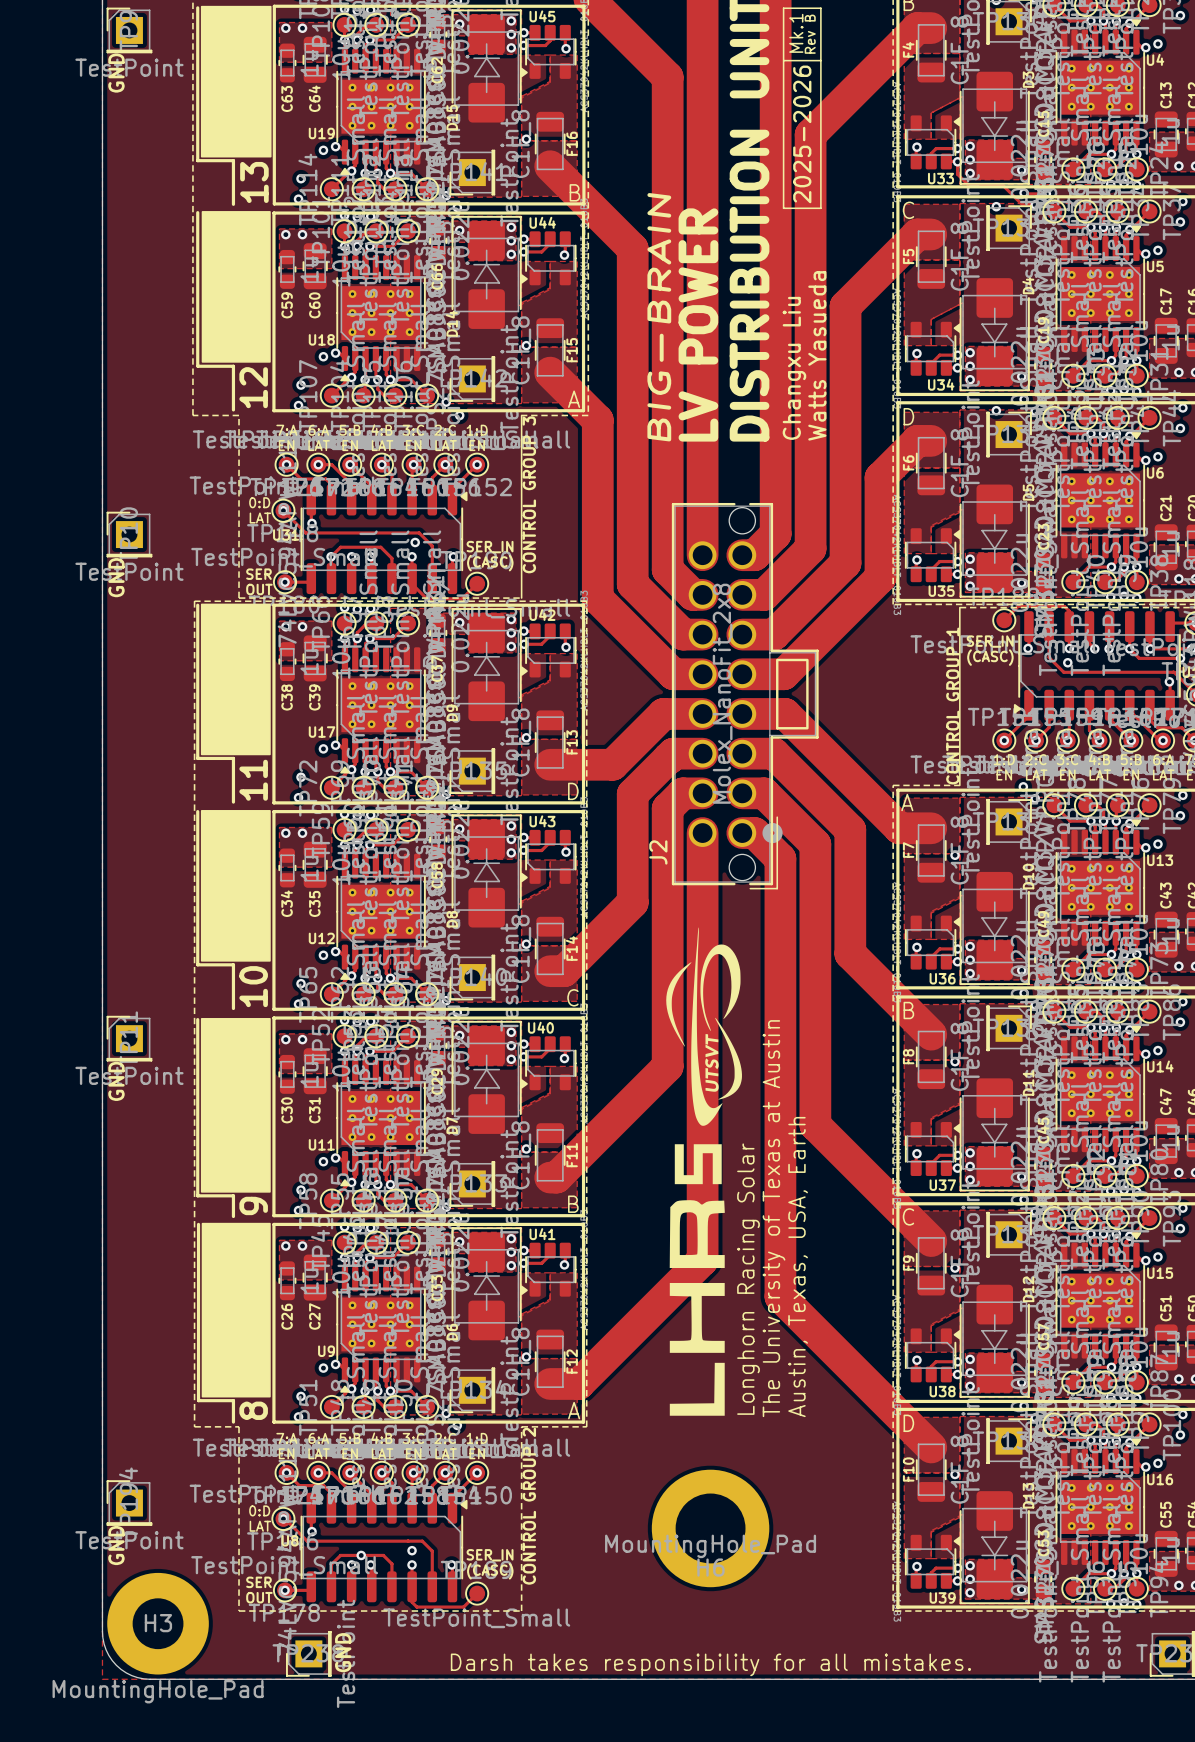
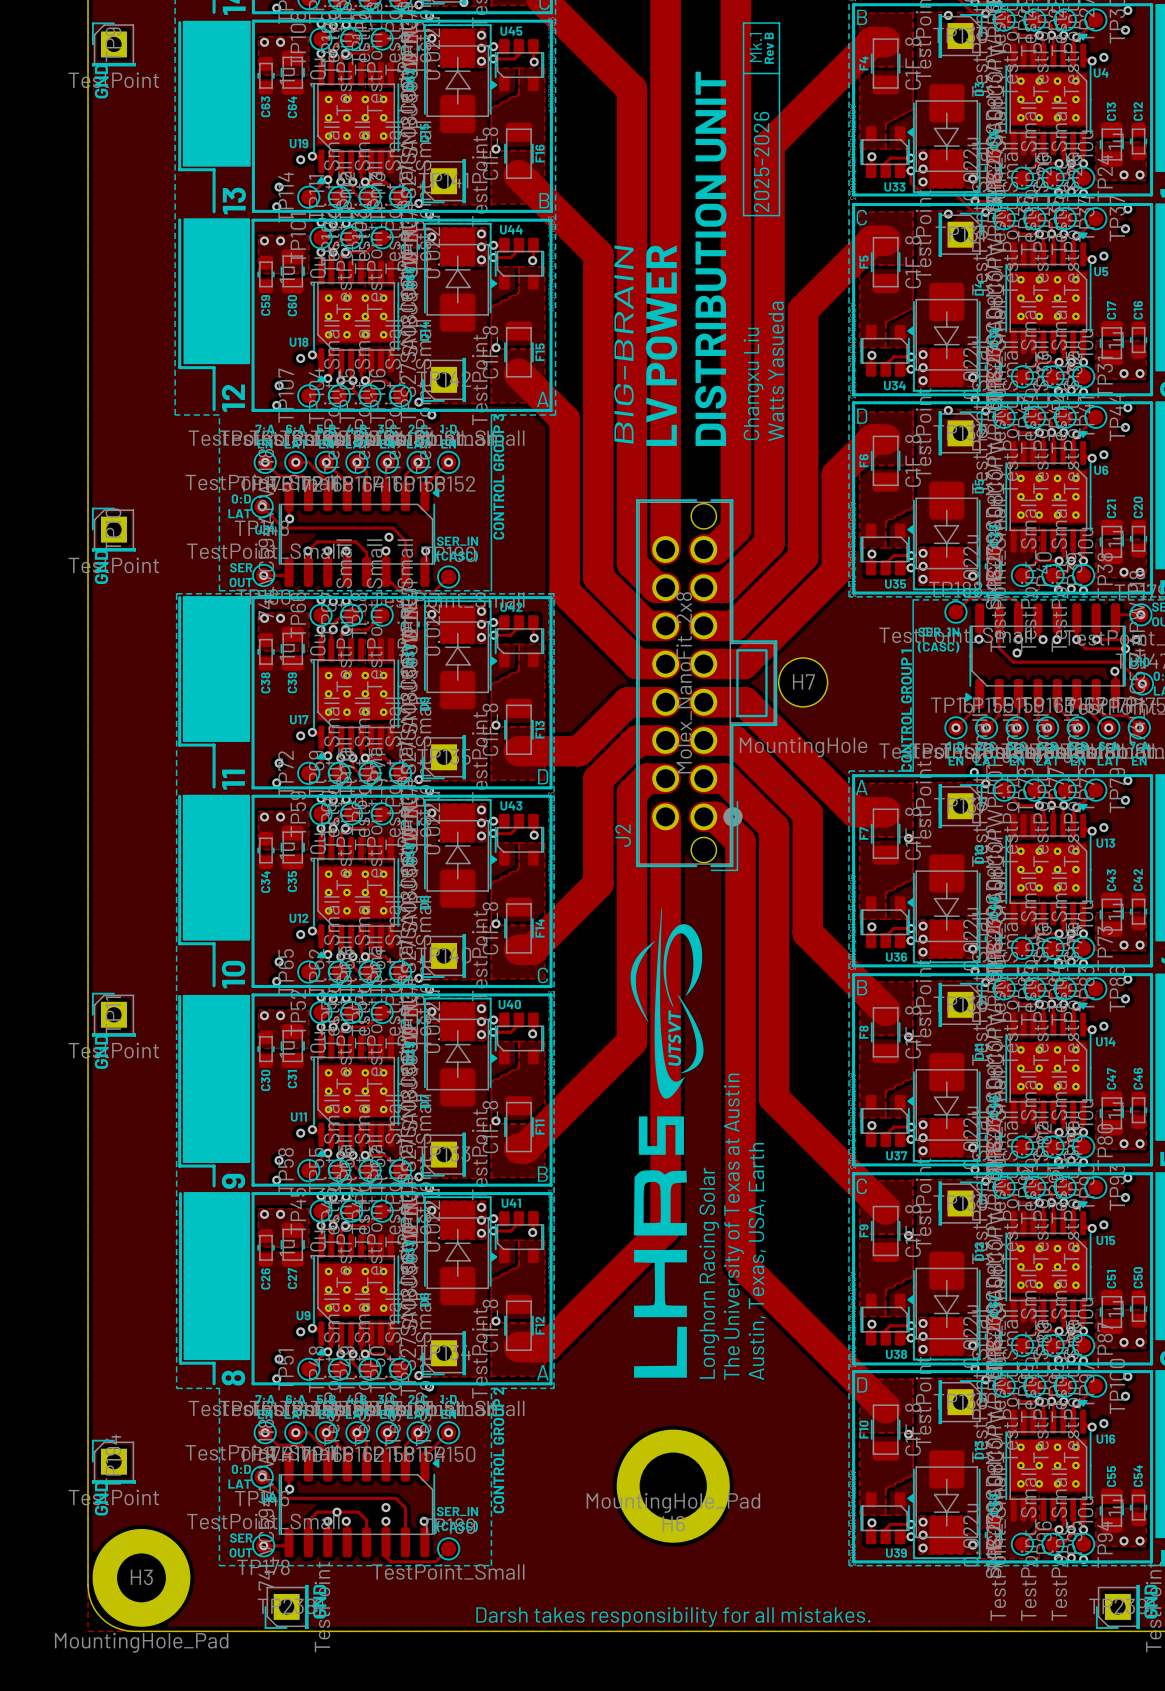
H7: none -> MountingHole (803, 682)

